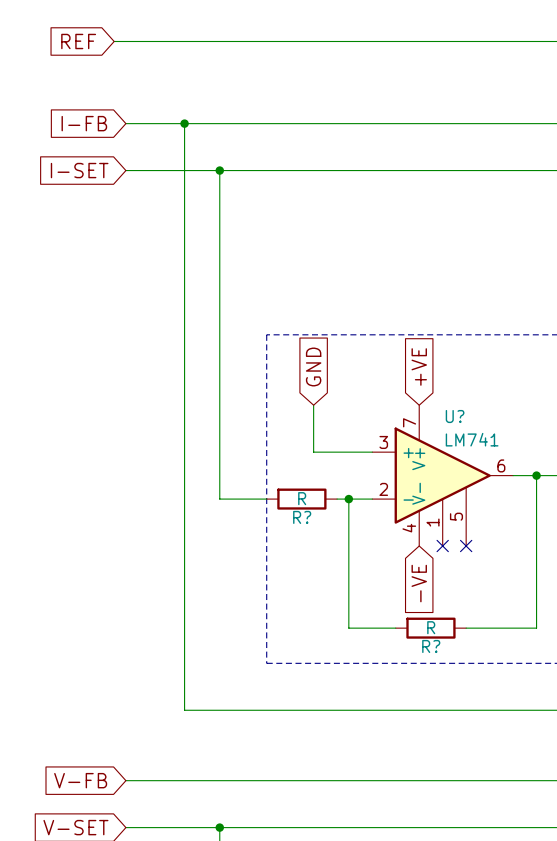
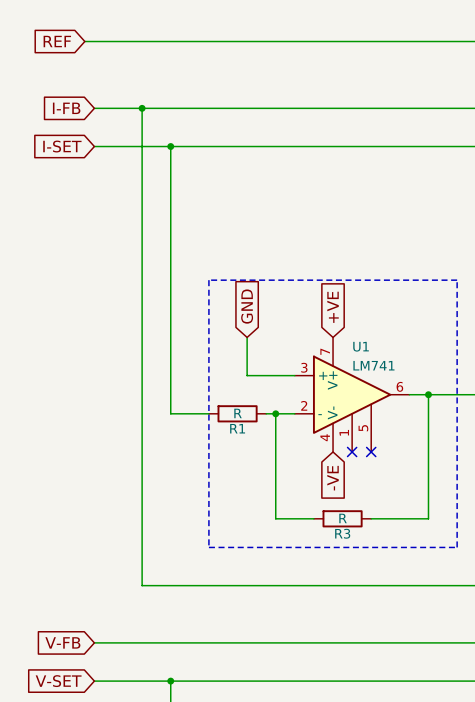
U? name: U? (455, 416) -> U1 (361, 346)
R? name: R? (302, 517) -> R1 (237, 428)
R? name: R? (431, 646) -> R3 (342, 533)

